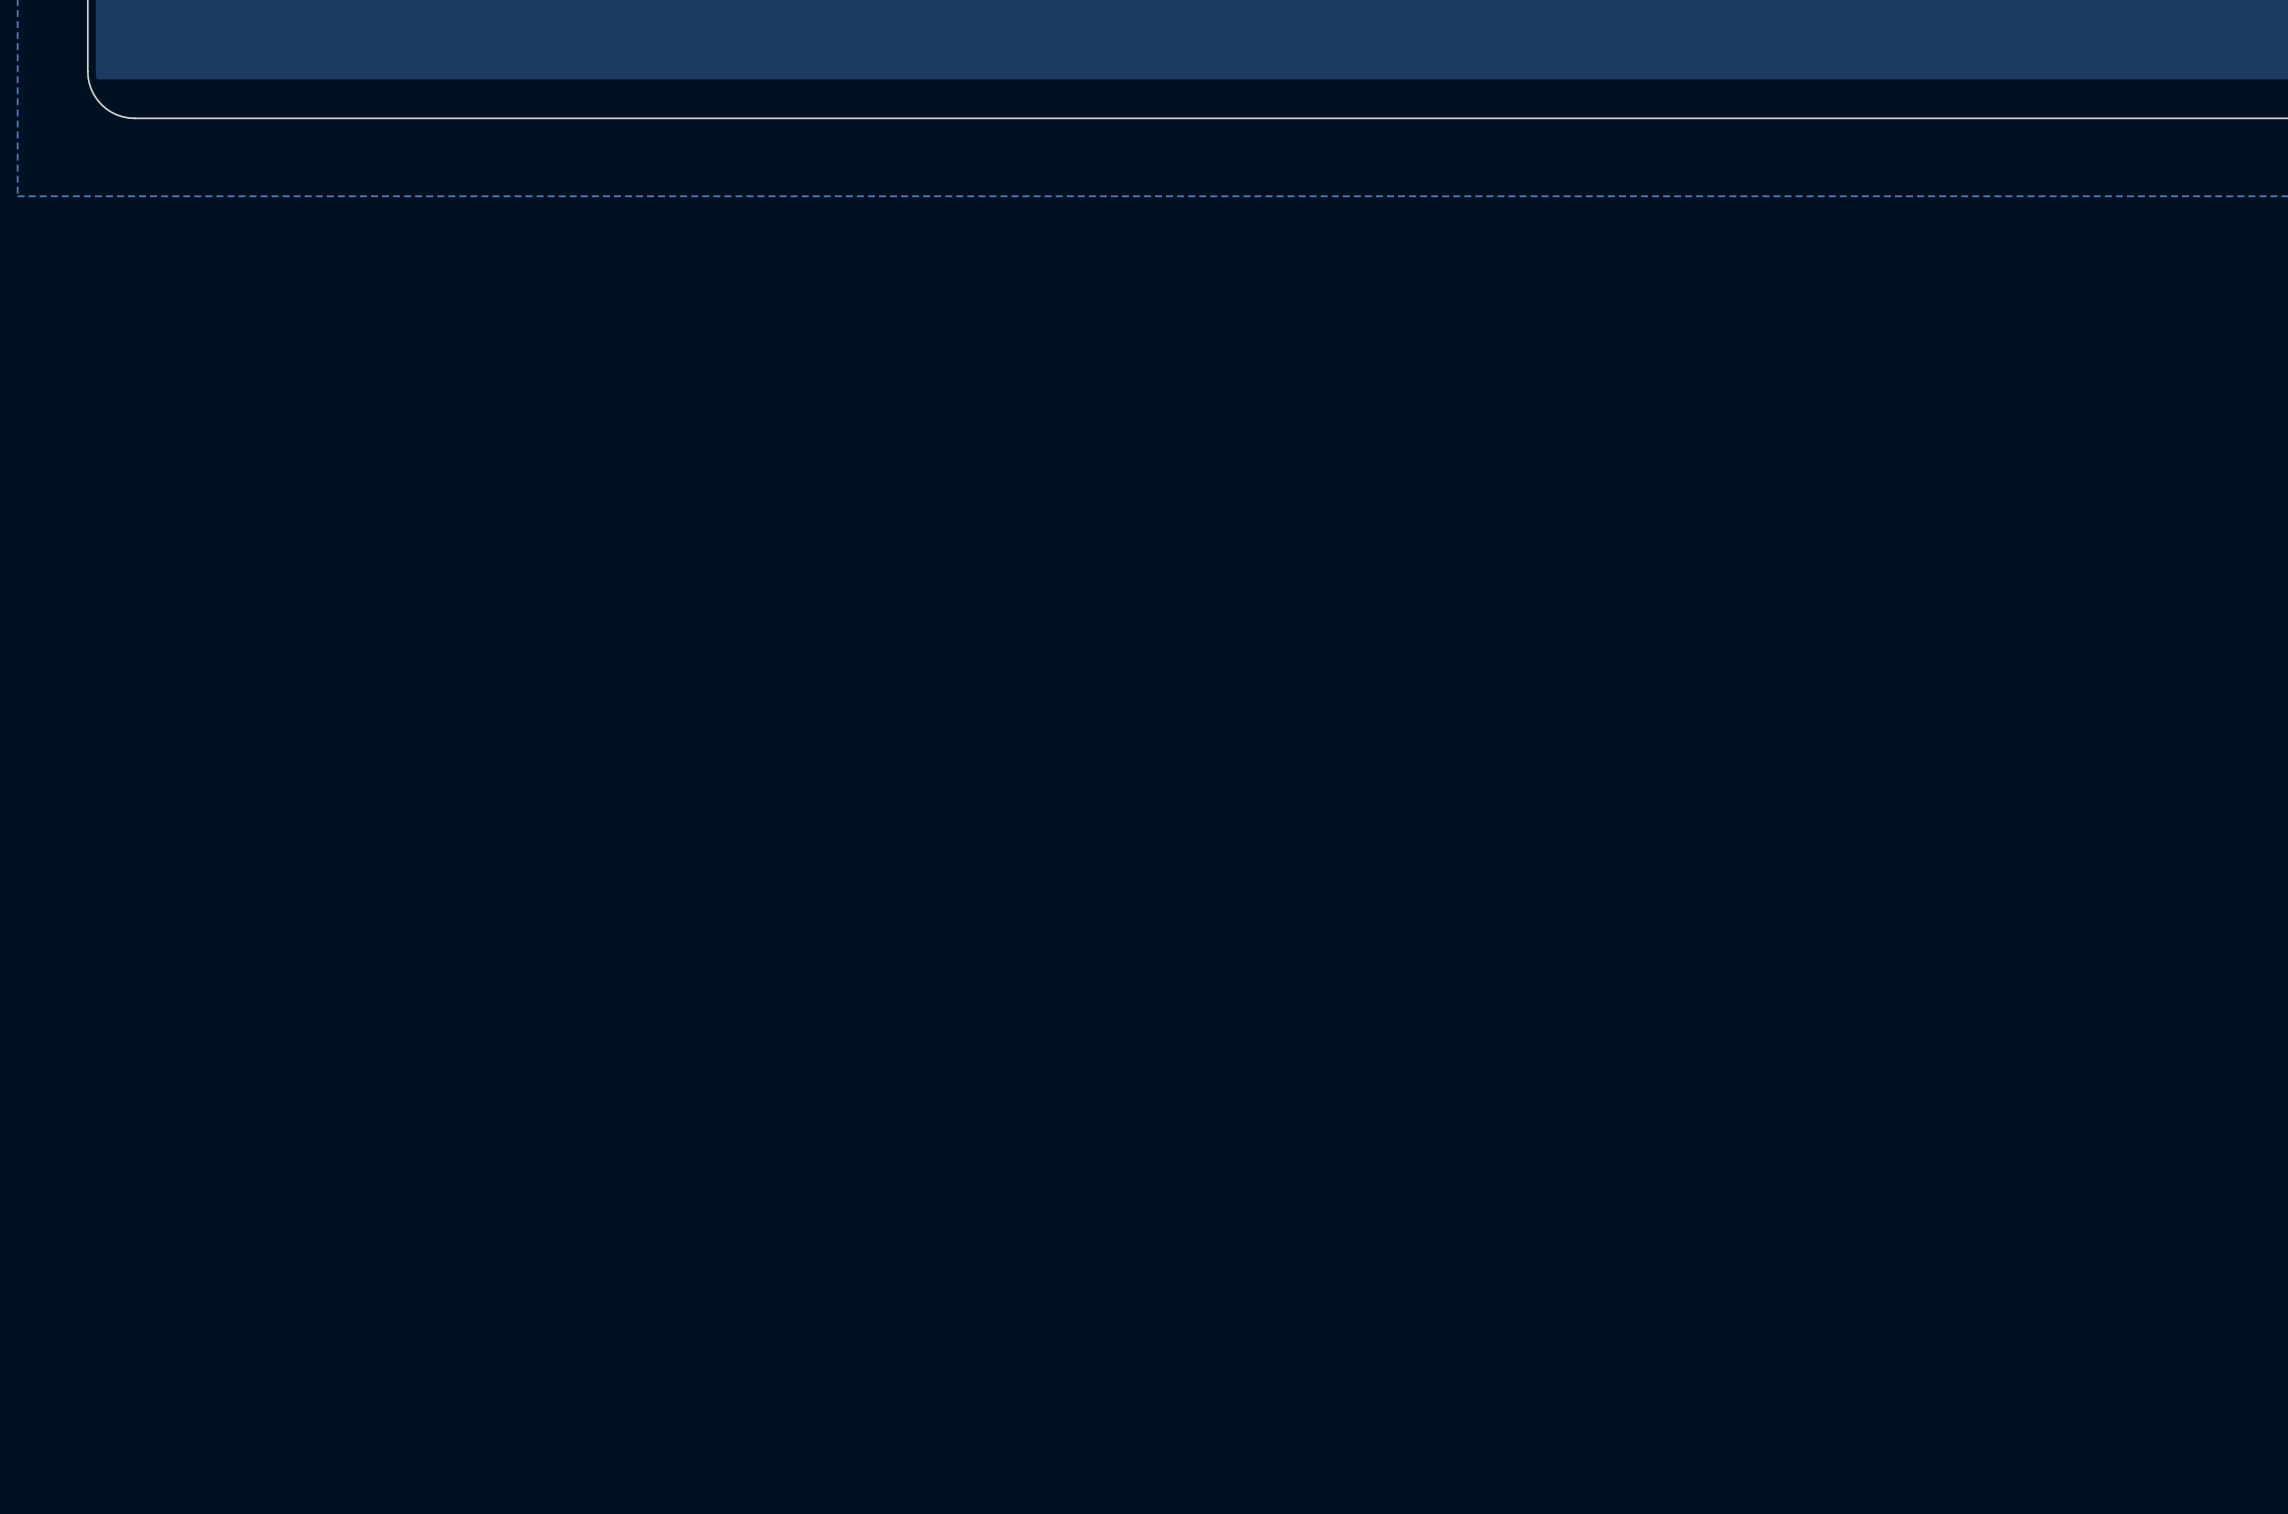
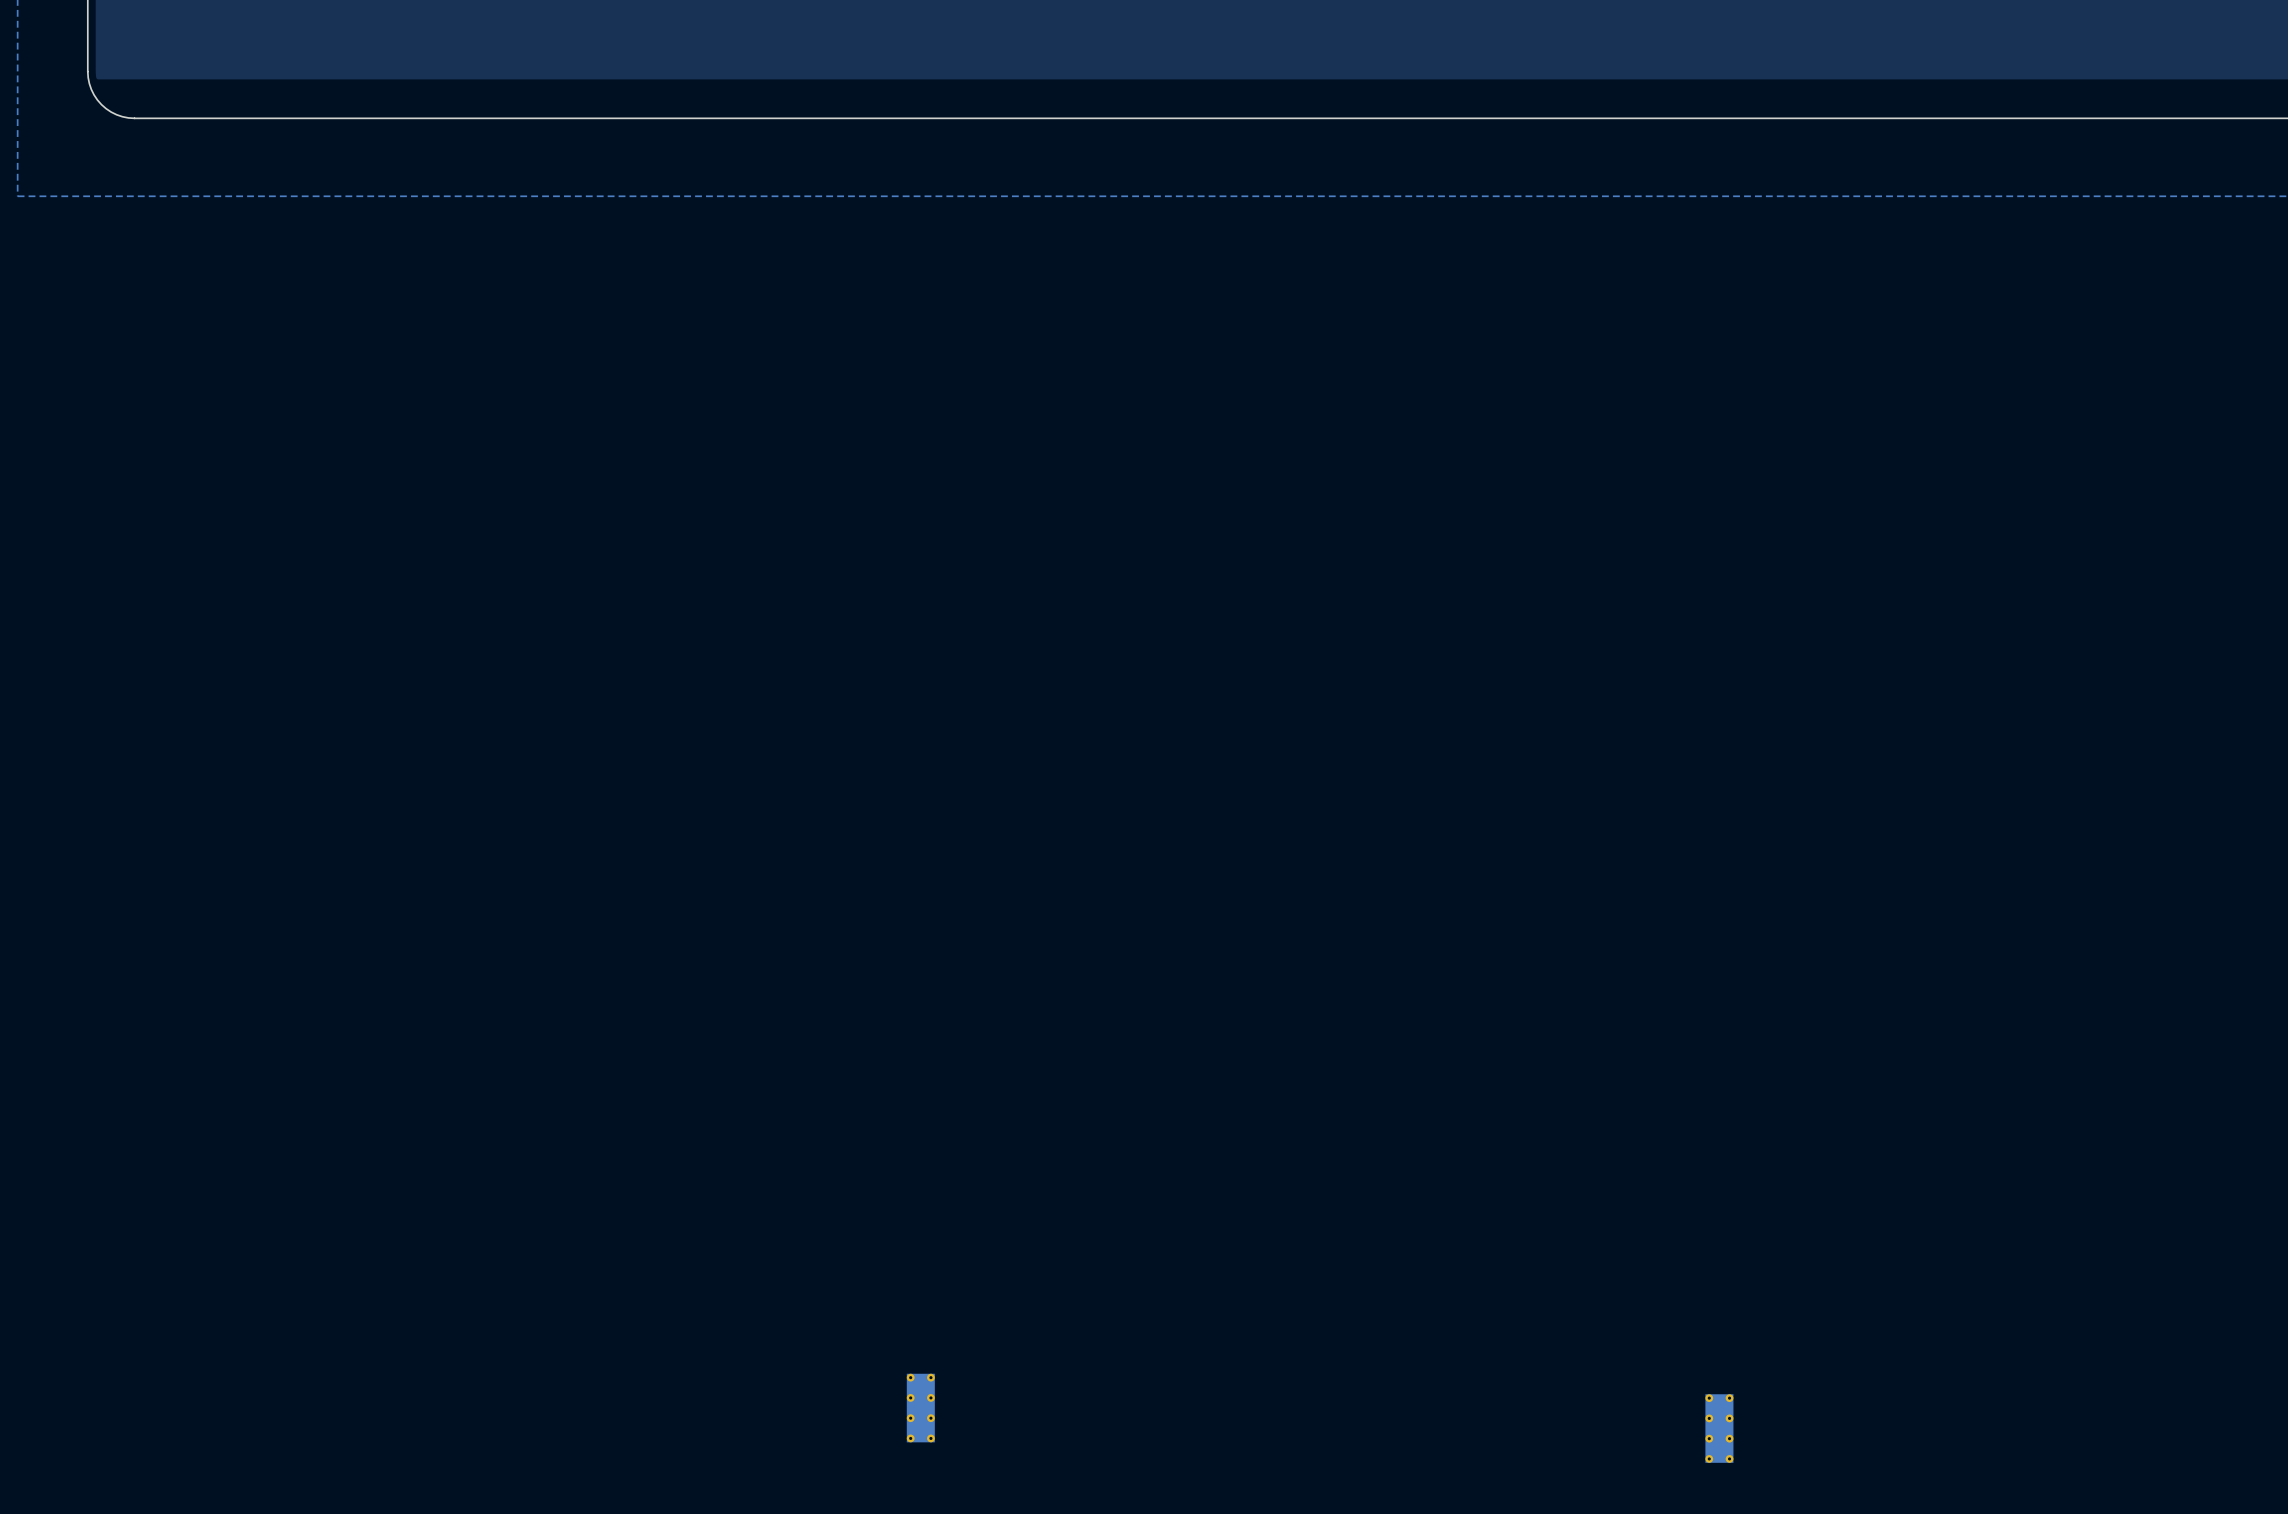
part: none -> (920, 1408)
part: none -> (1719, 1428)

